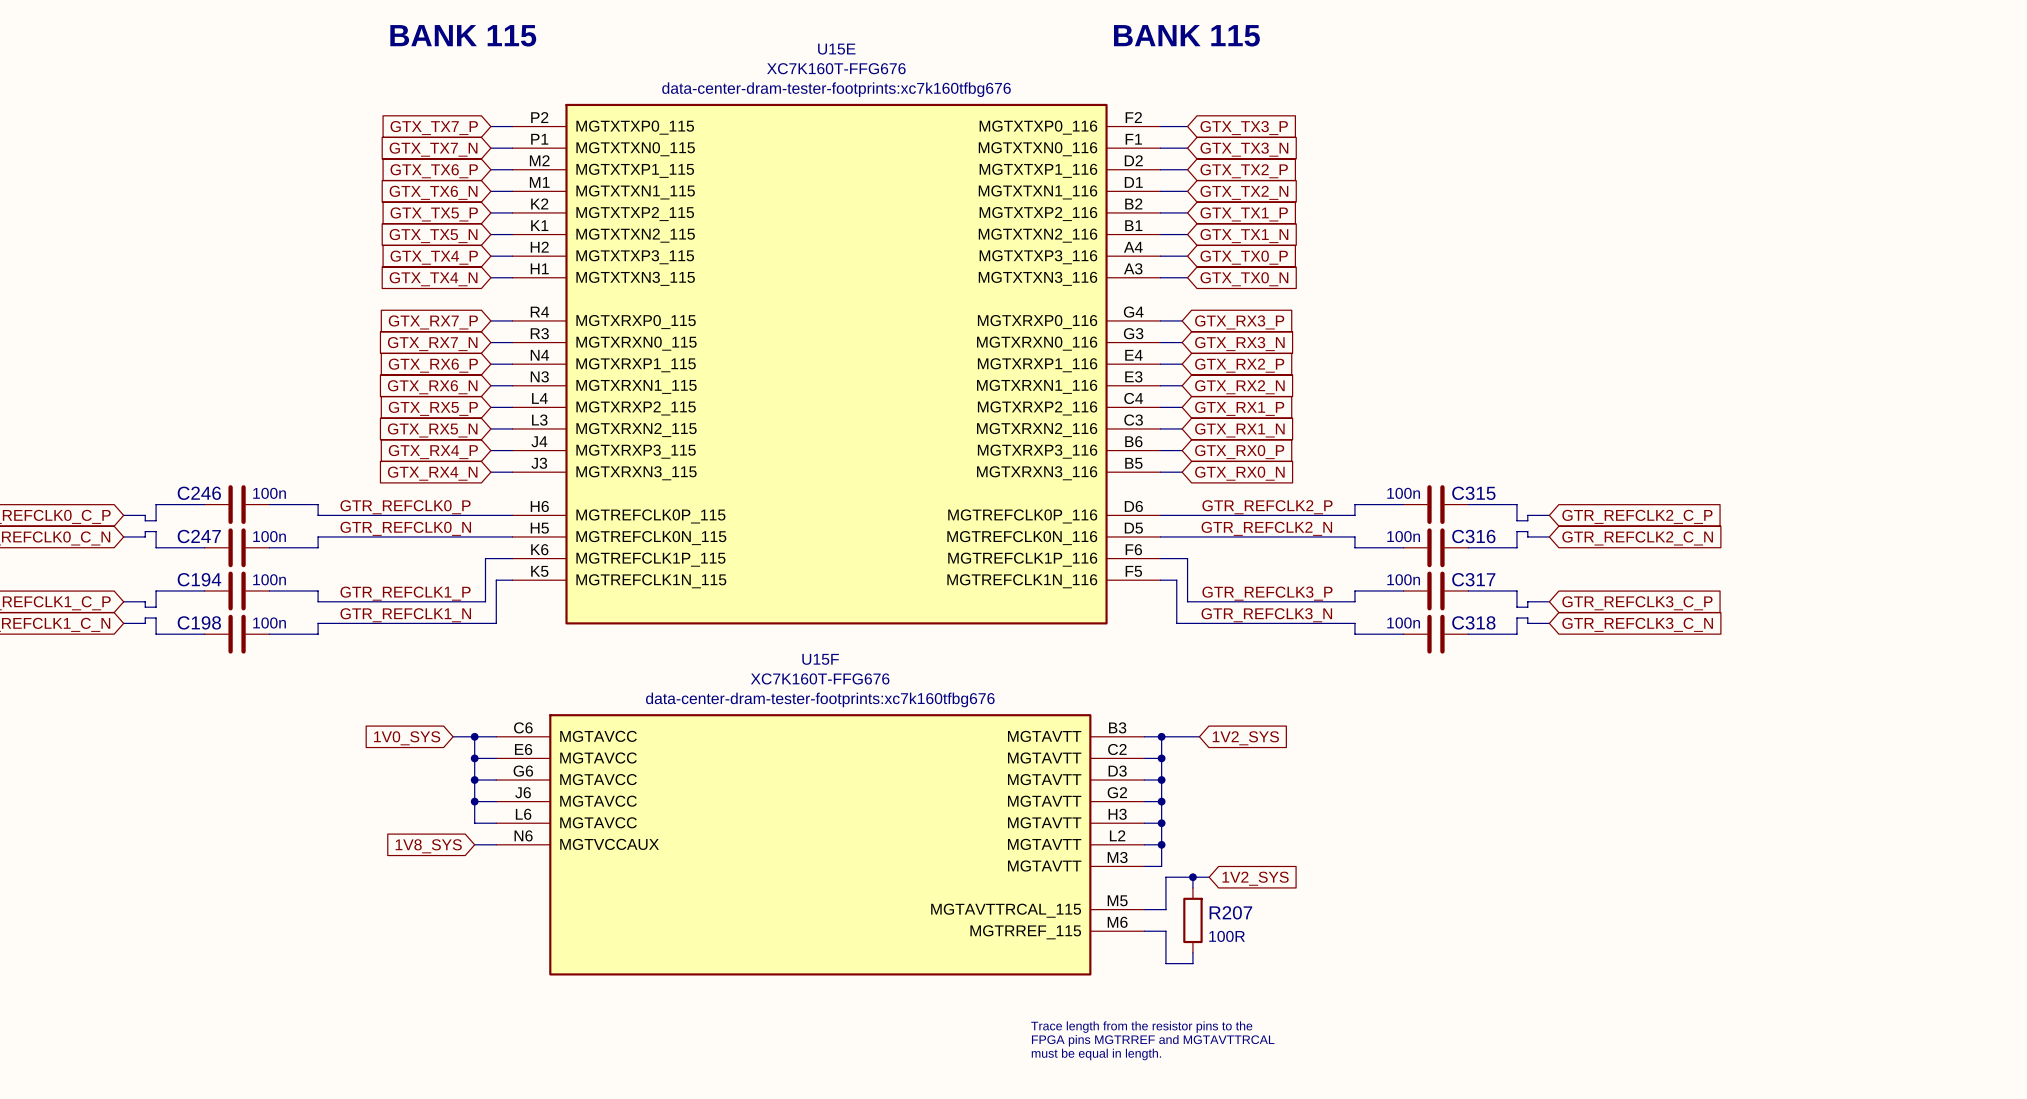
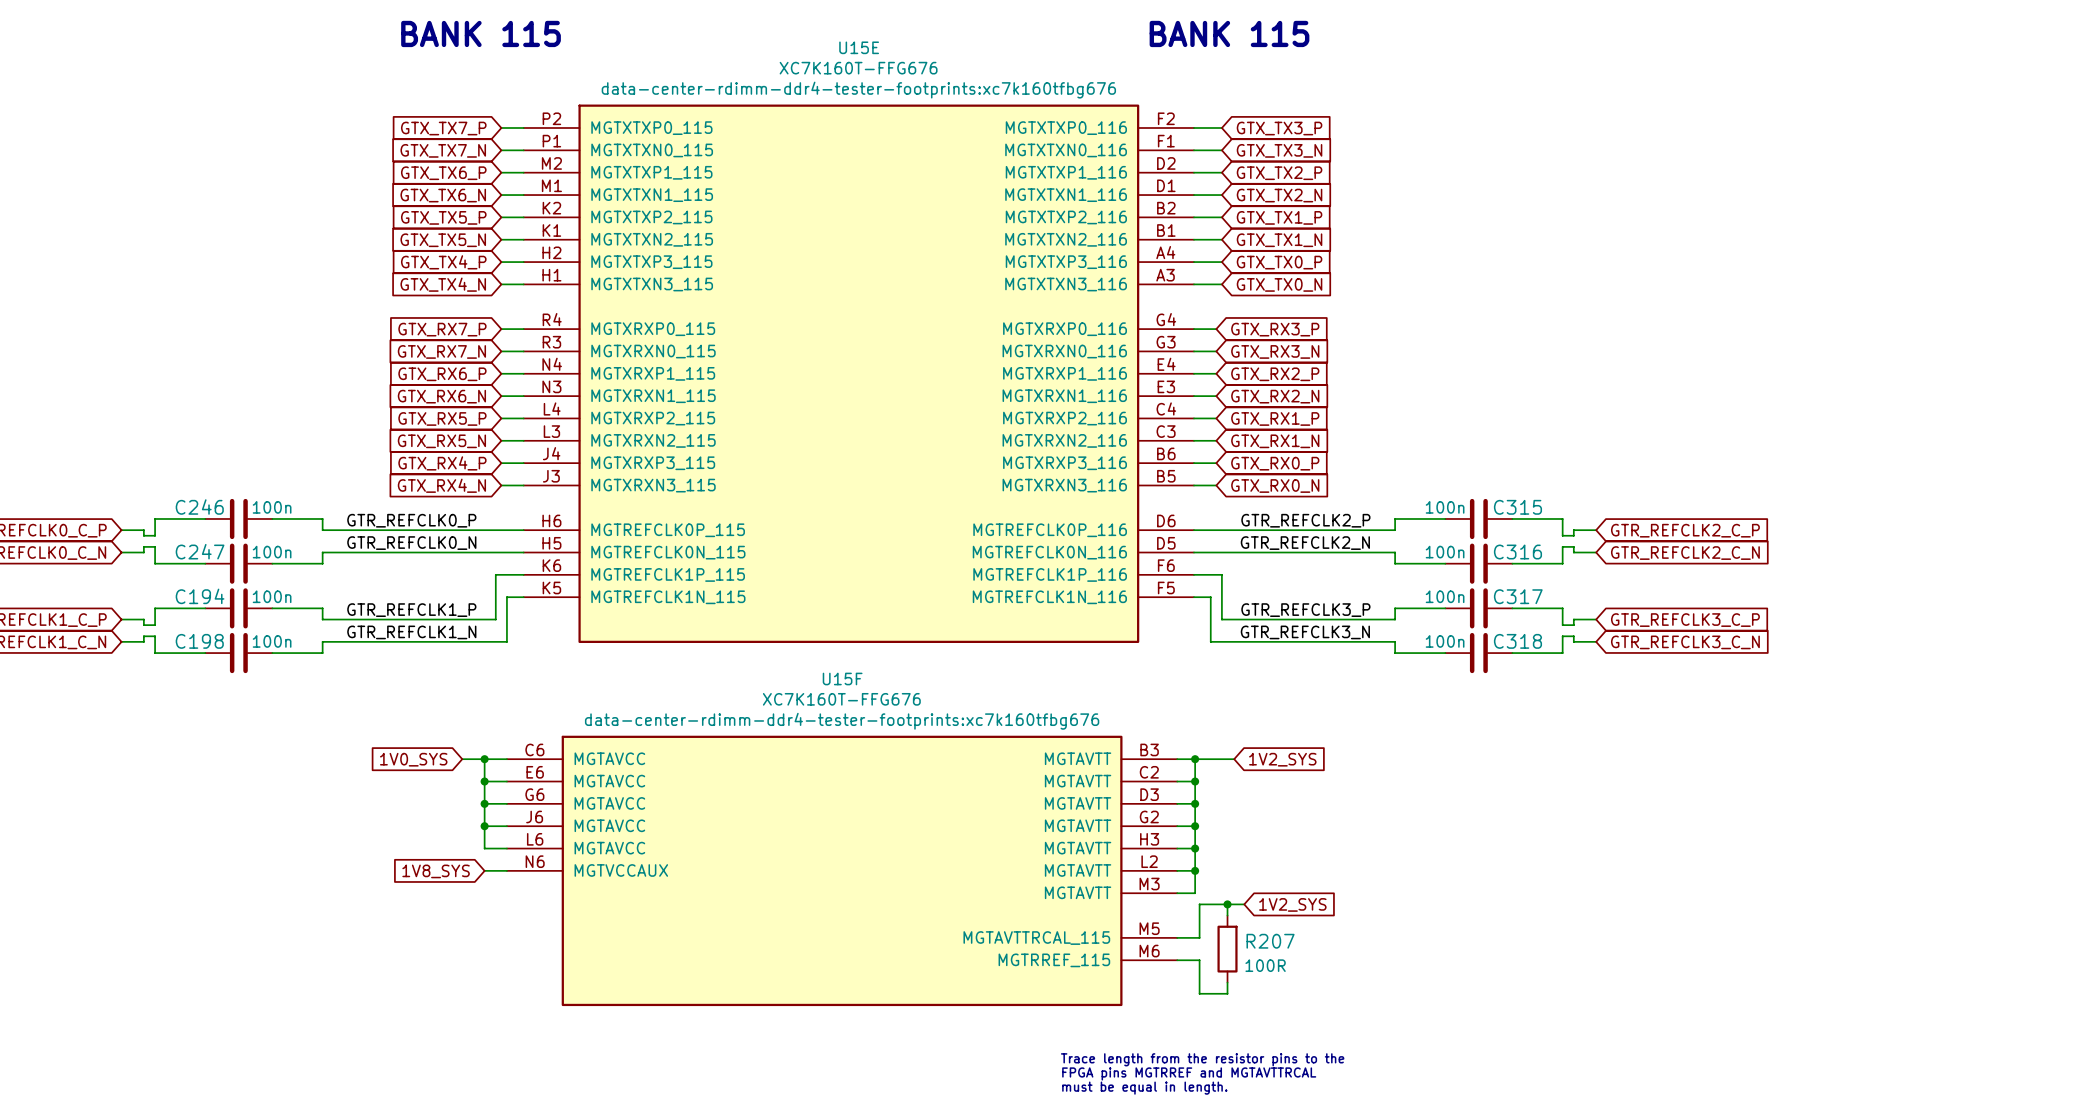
U15E text: data-center-dram-tester-footprints:xc7k160tfbg676 (836, 89) -> data-center-rdimm-ddr4-tester-footprints:xc7k160tfbg676 (858, 90)
U15F text: data-center-dram-tester-footprints:xc7k160tfbg676 (820, 699) -> data-center-rdimm-ddr4-tester-footprints:xc7k160tfbg676 (842, 721)

